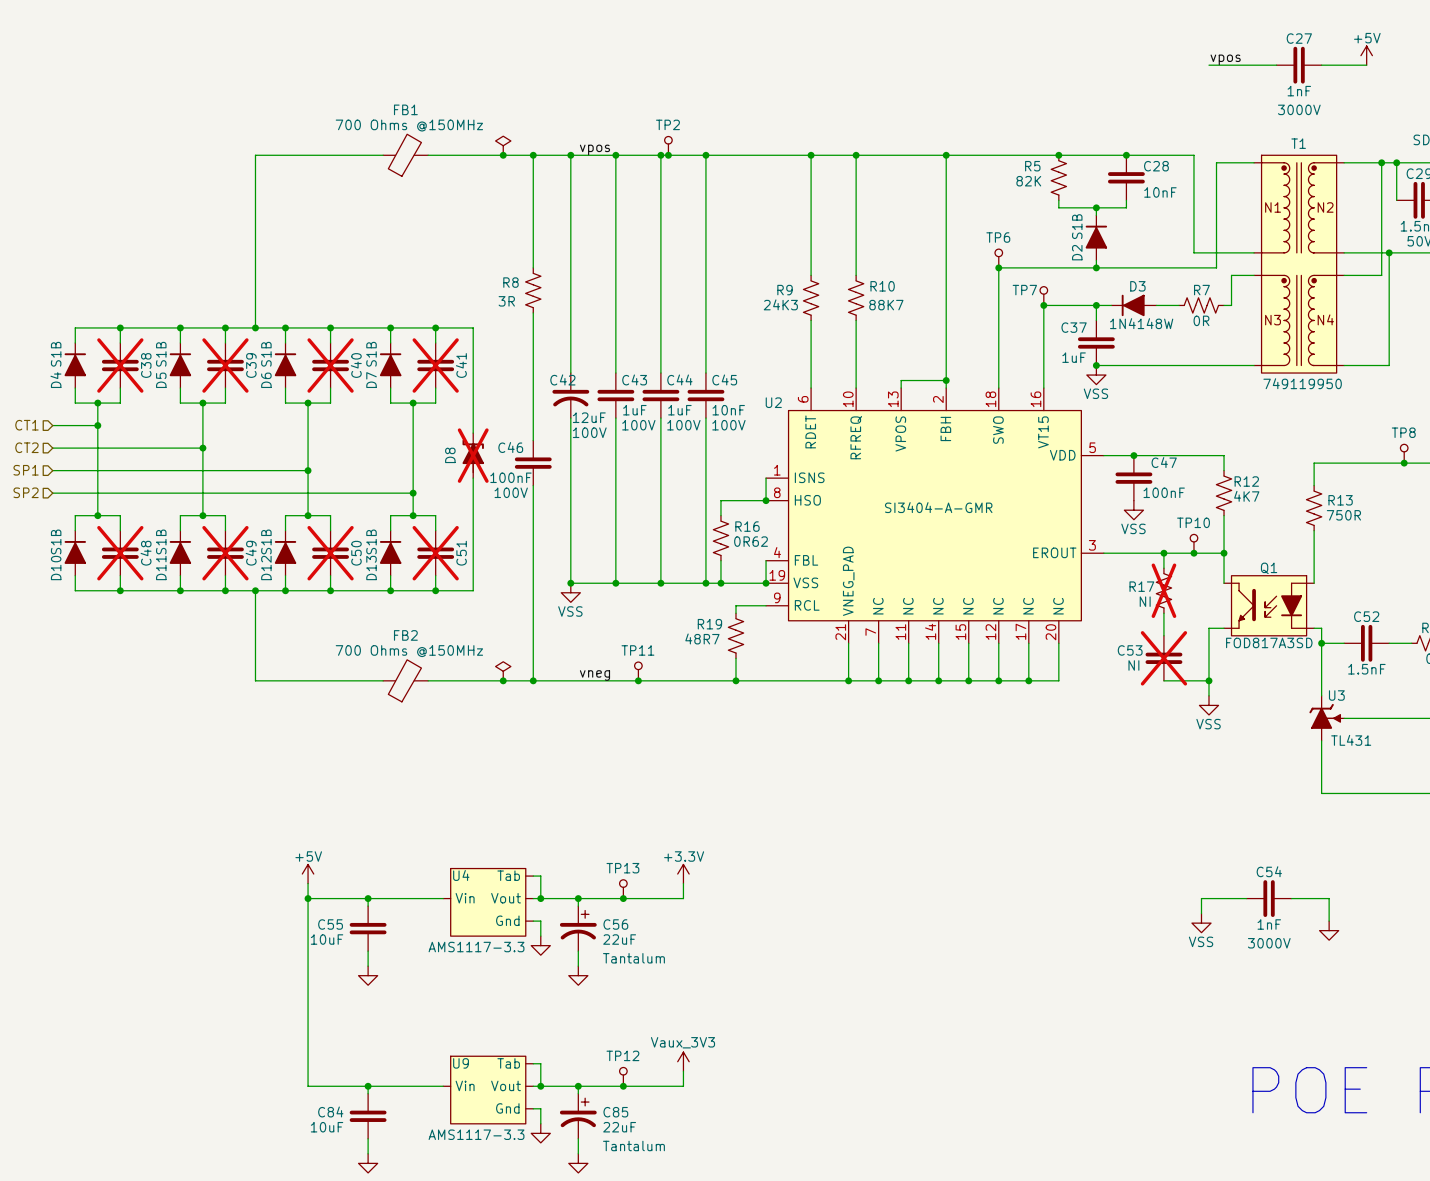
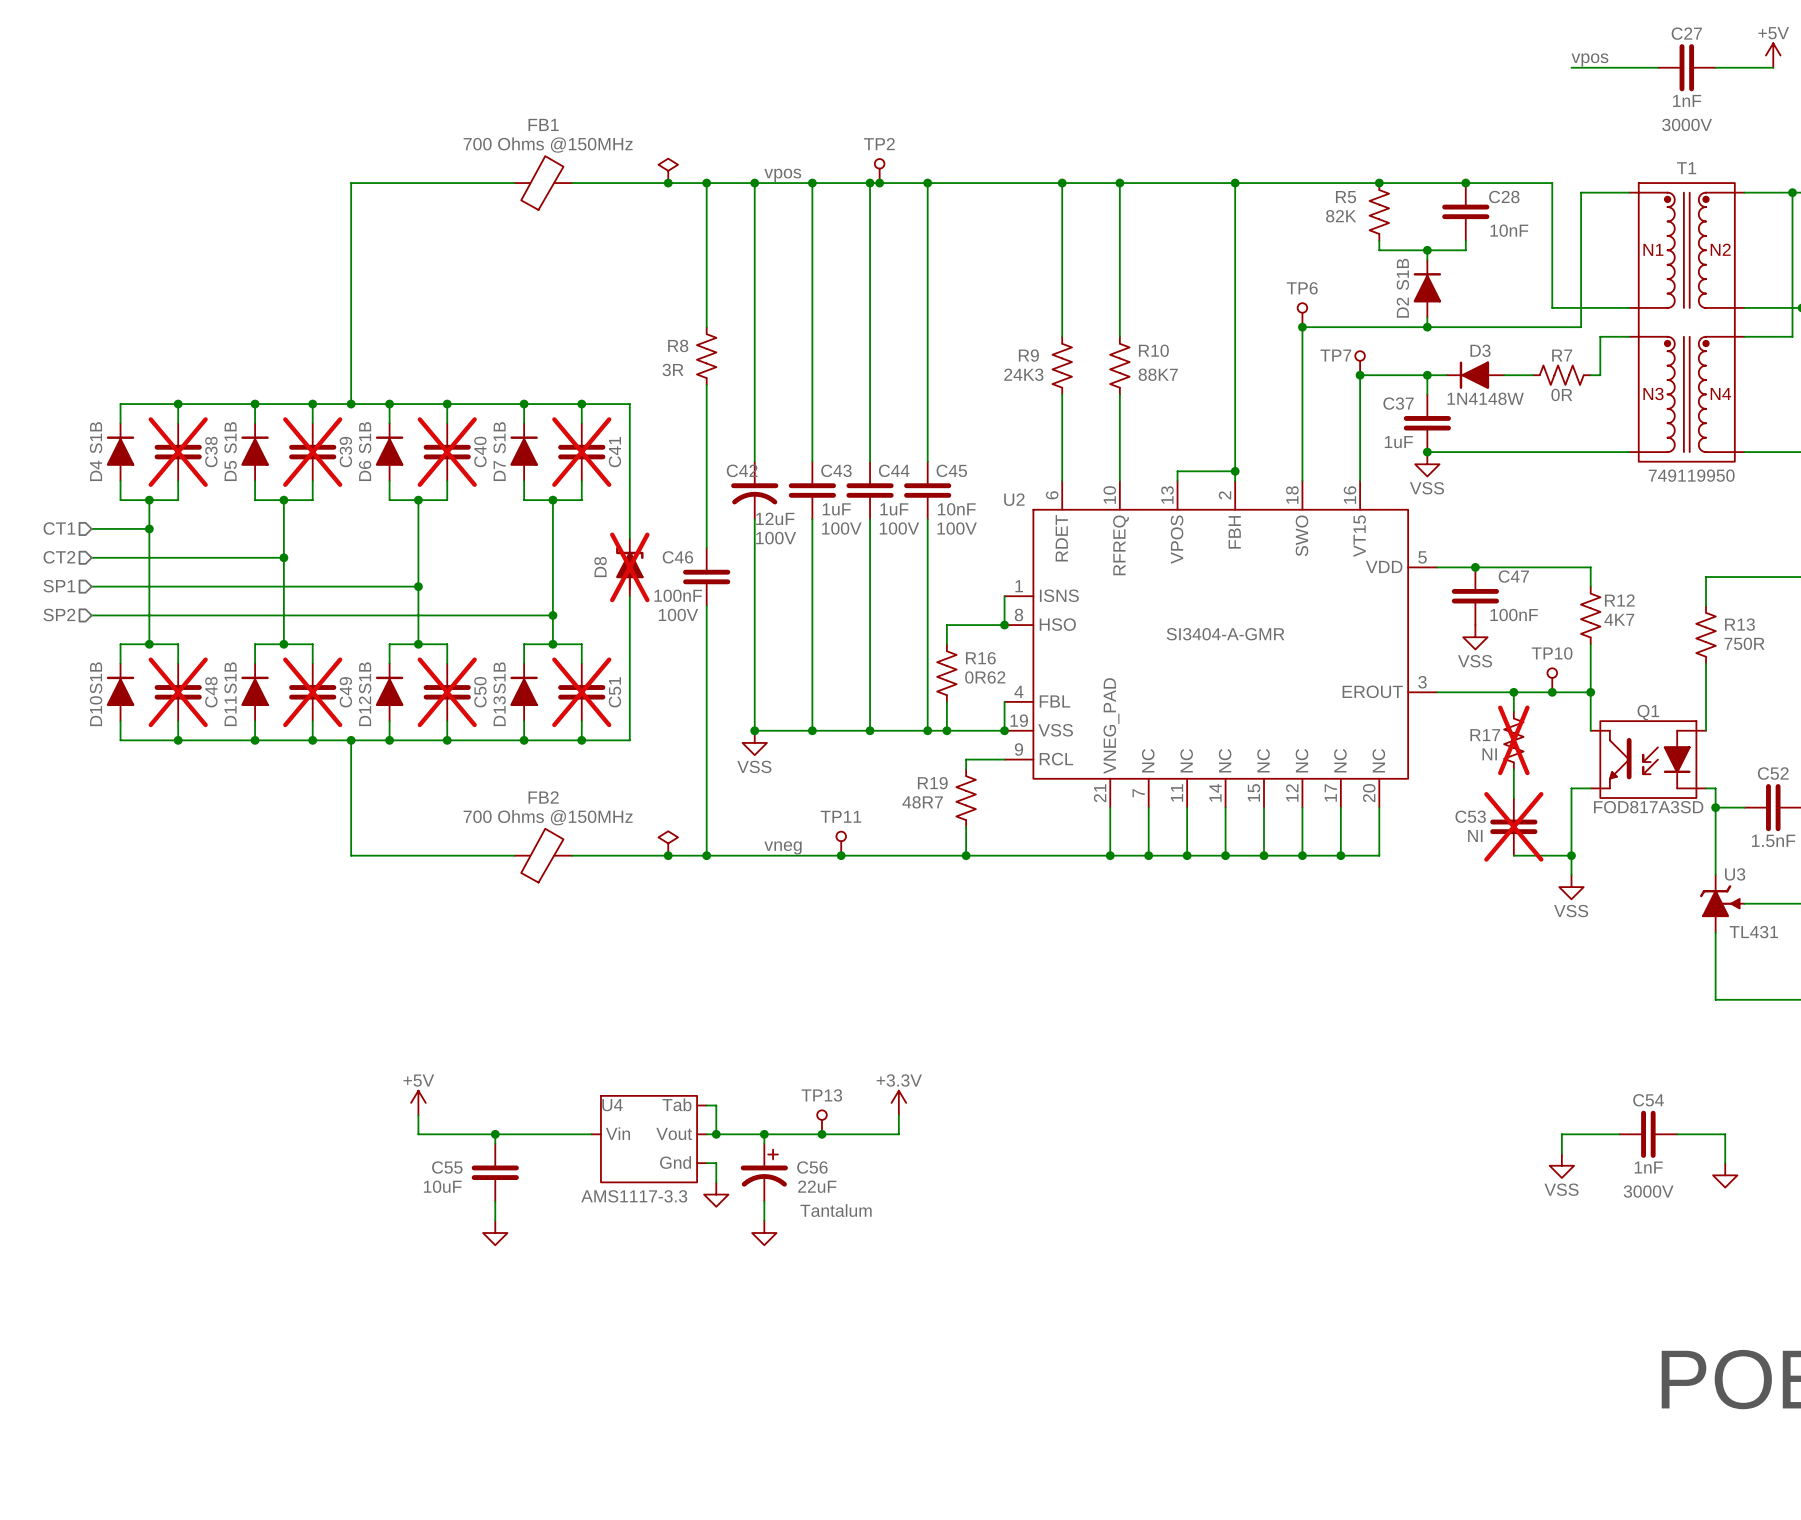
wire: (308, 898) (308, 1086) (443, 1086) -> none
junction: (308, 898) -> none
power symbol: Vaux_3V3 (683, 1061) -> none
wire: (533, 1063) (540, 1063) (540, 1086) -> none
wire: (683, 1071) (683, 1086) (533, 1086) -> none
TP12: (623, 1076) -> none
wire: (368, 1086) (368, 1093) -> none
junction: (368, 1086) -> none
junction: (540, 1086) -> none
wire: (578, 1086) (578, 1093) -> none
junction: (578, 1086) -> none
junction: (623, 1086) -> none
U9: (488, 1090) -> none
wire: (533, 1108) (540, 1108) (540, 1123) -> none
C84: 10uF (368, 1116) -> none
C85: 22uF (578, 1116) -> none
power symbol: (540, 1133) -> none
wire: (368, 1138) (368, 1153) -> none
wire: (578, 1138) (578, 1153) -> none
power symbol: (368, 1163) -> none
power symbol: (578, 1163) -> none

